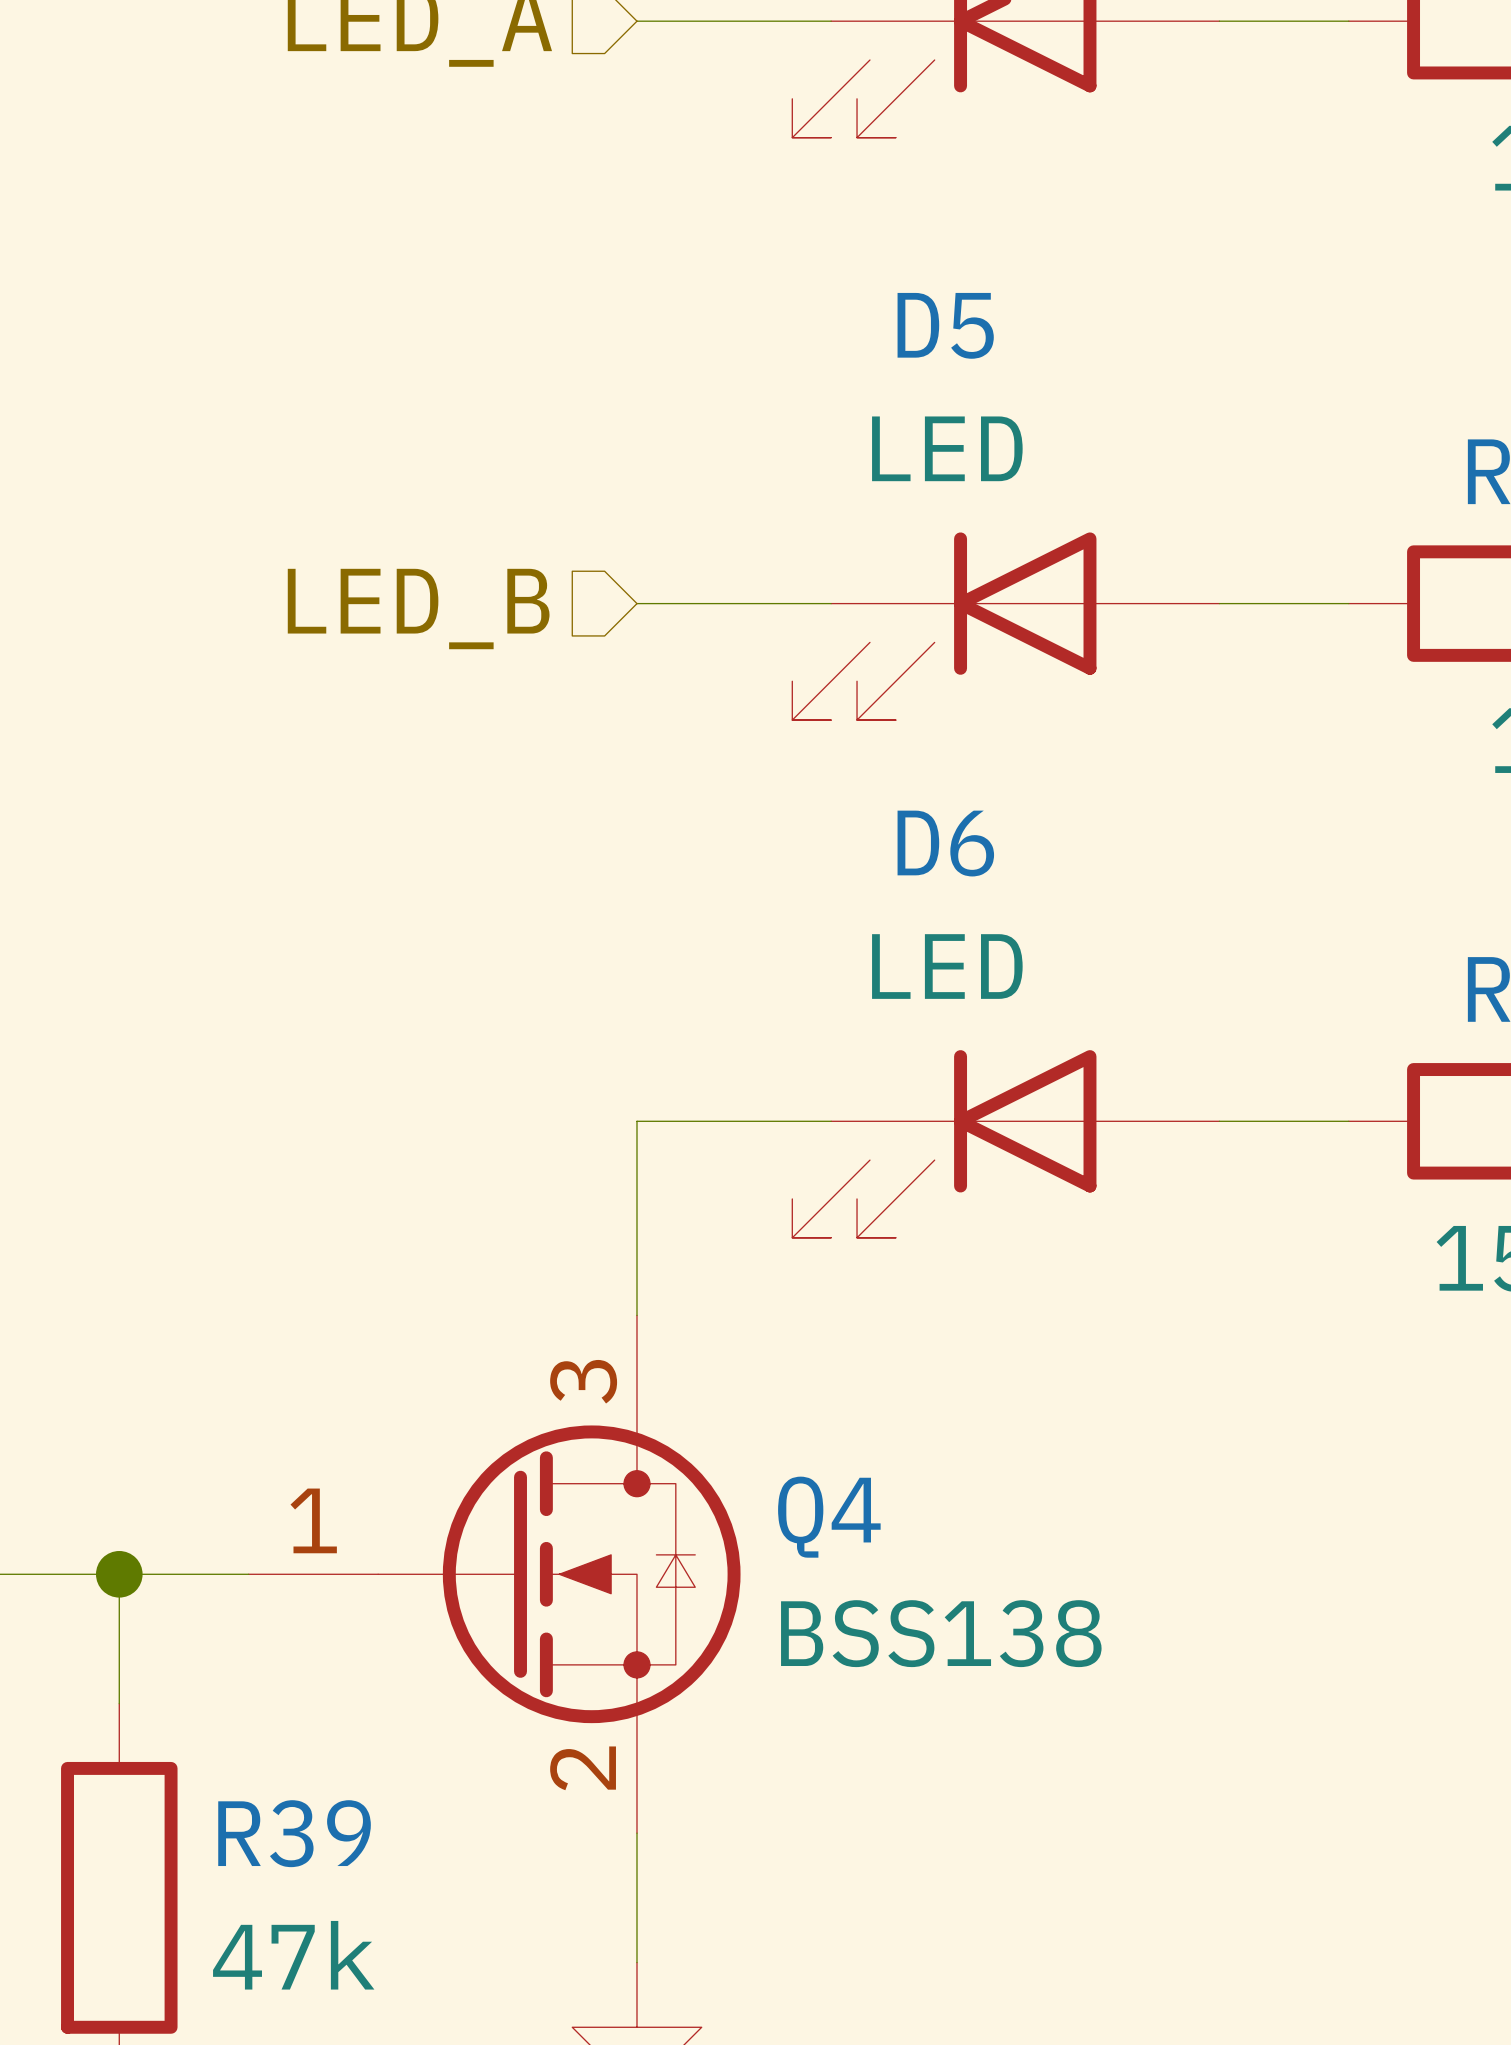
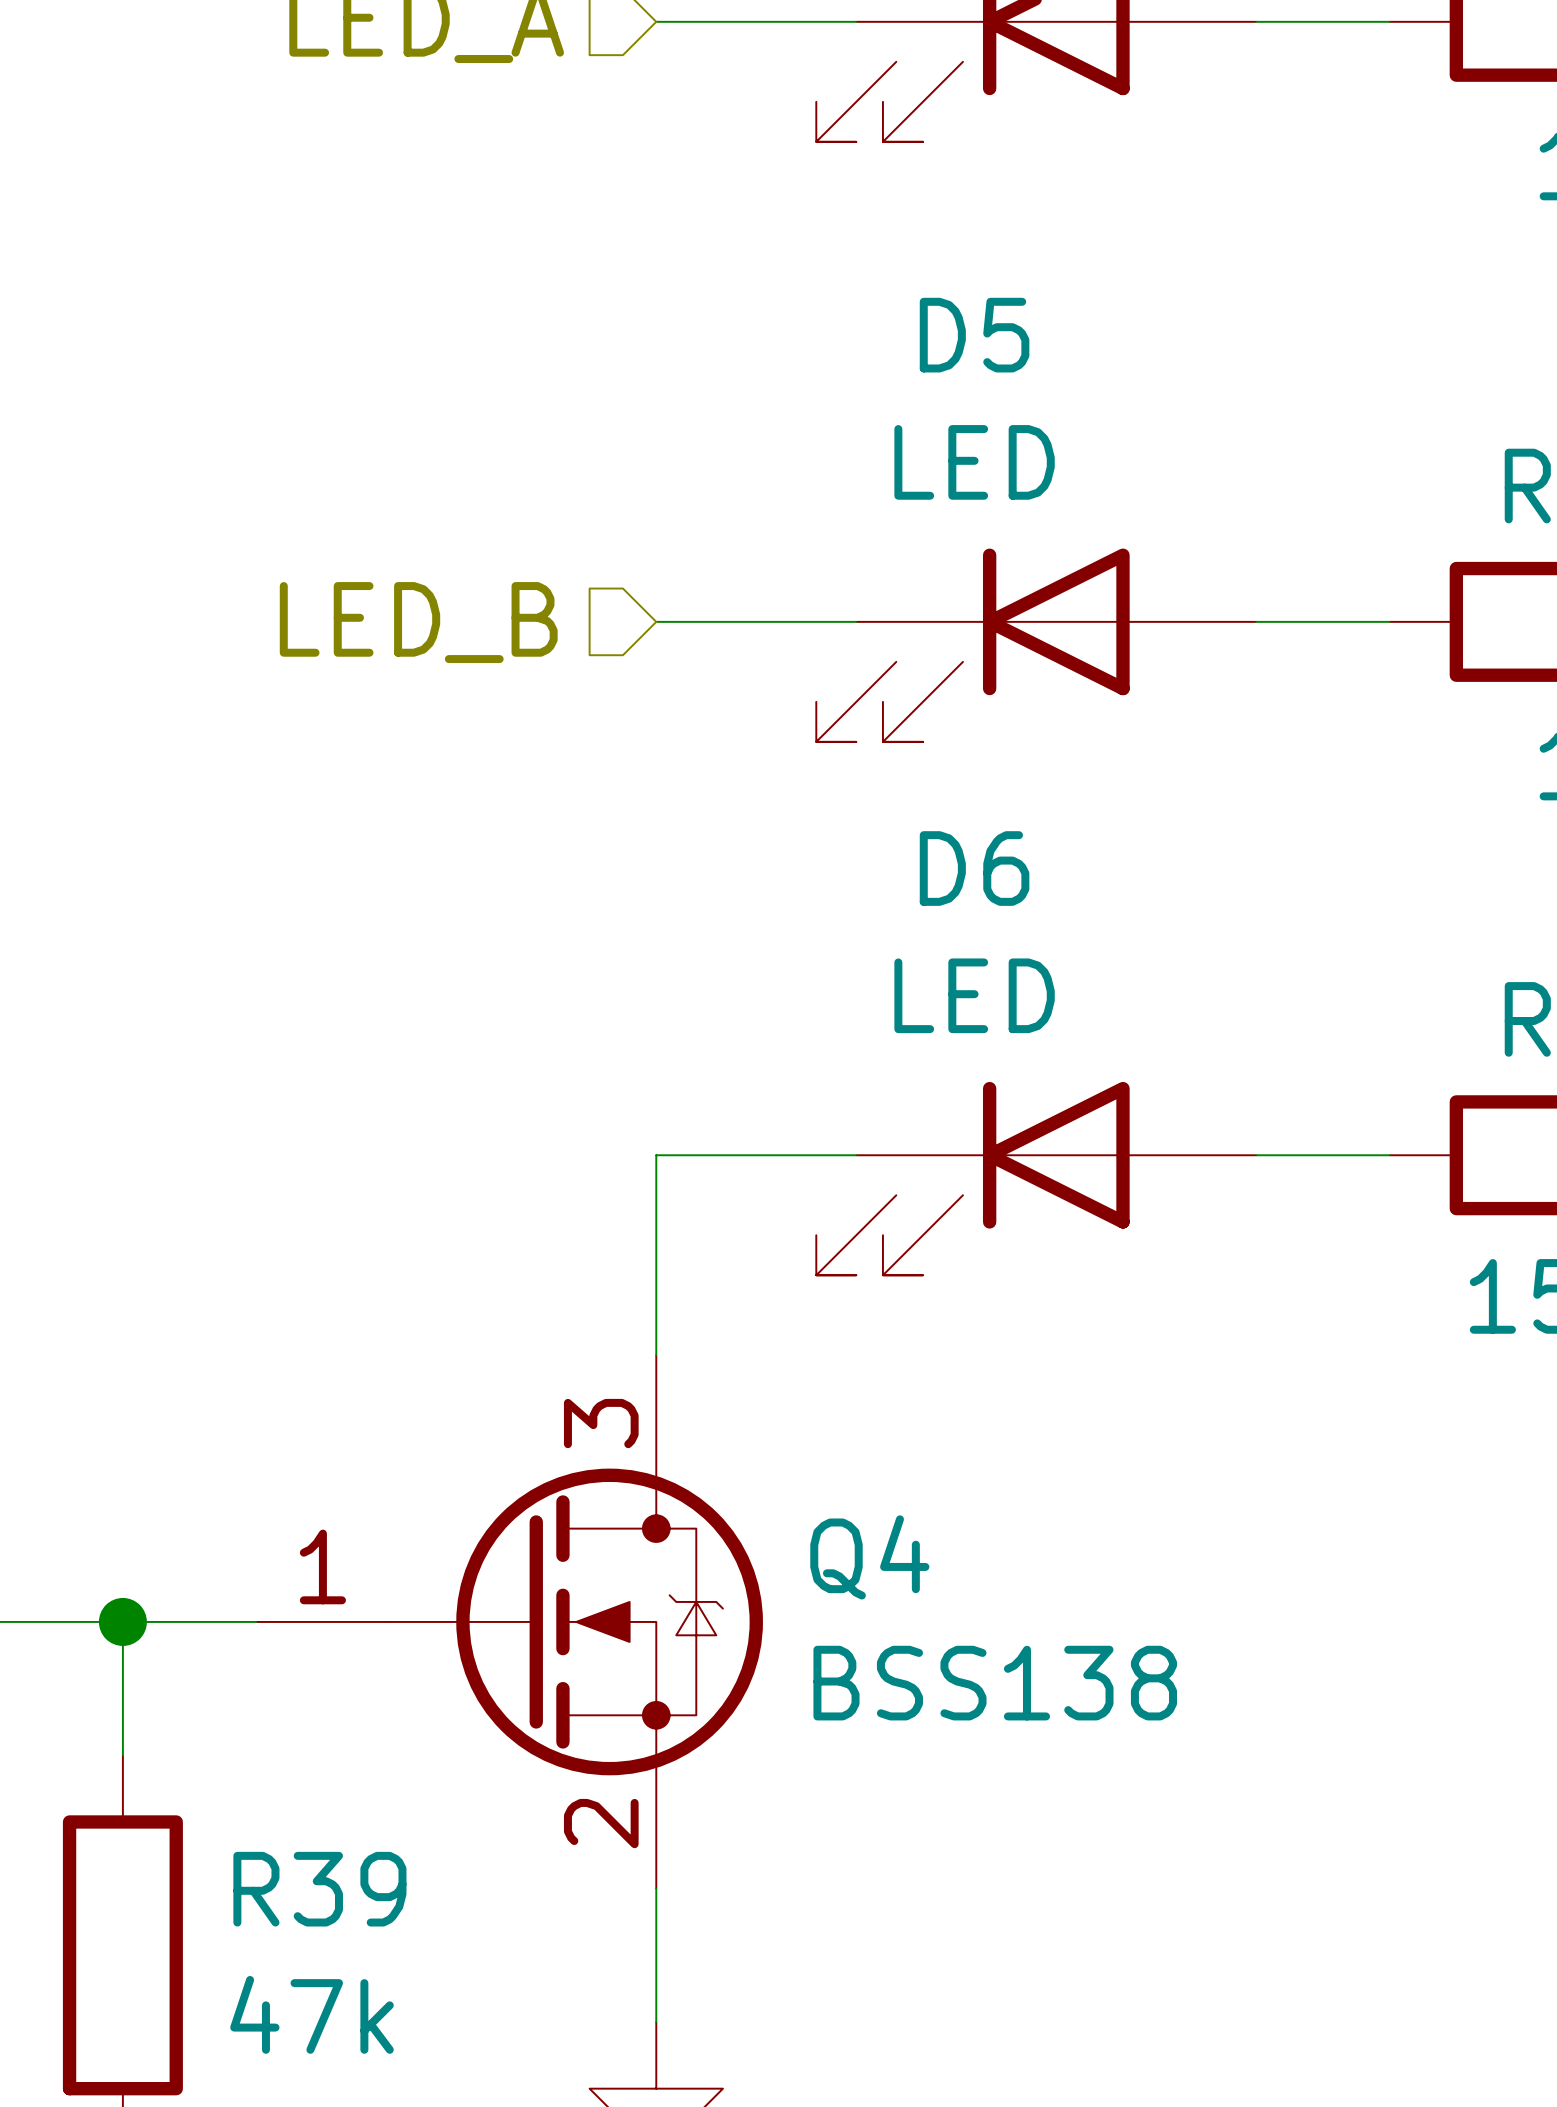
Q4 symbol: [248, 1315, 741, 1834] -> [256, 1355, 763, 1889]

